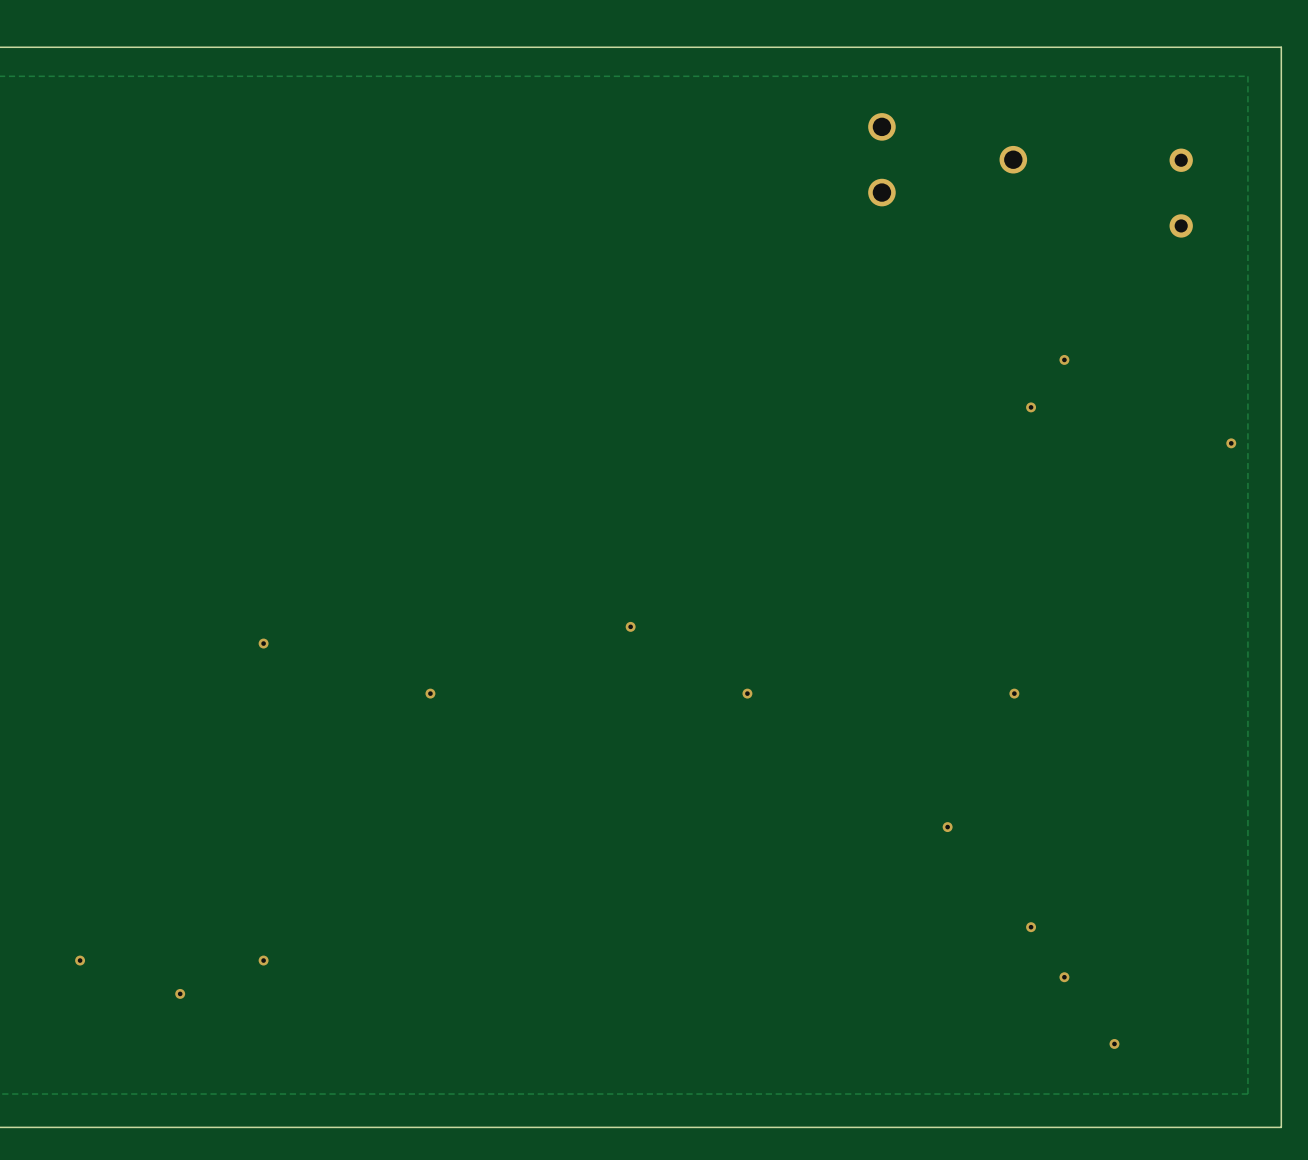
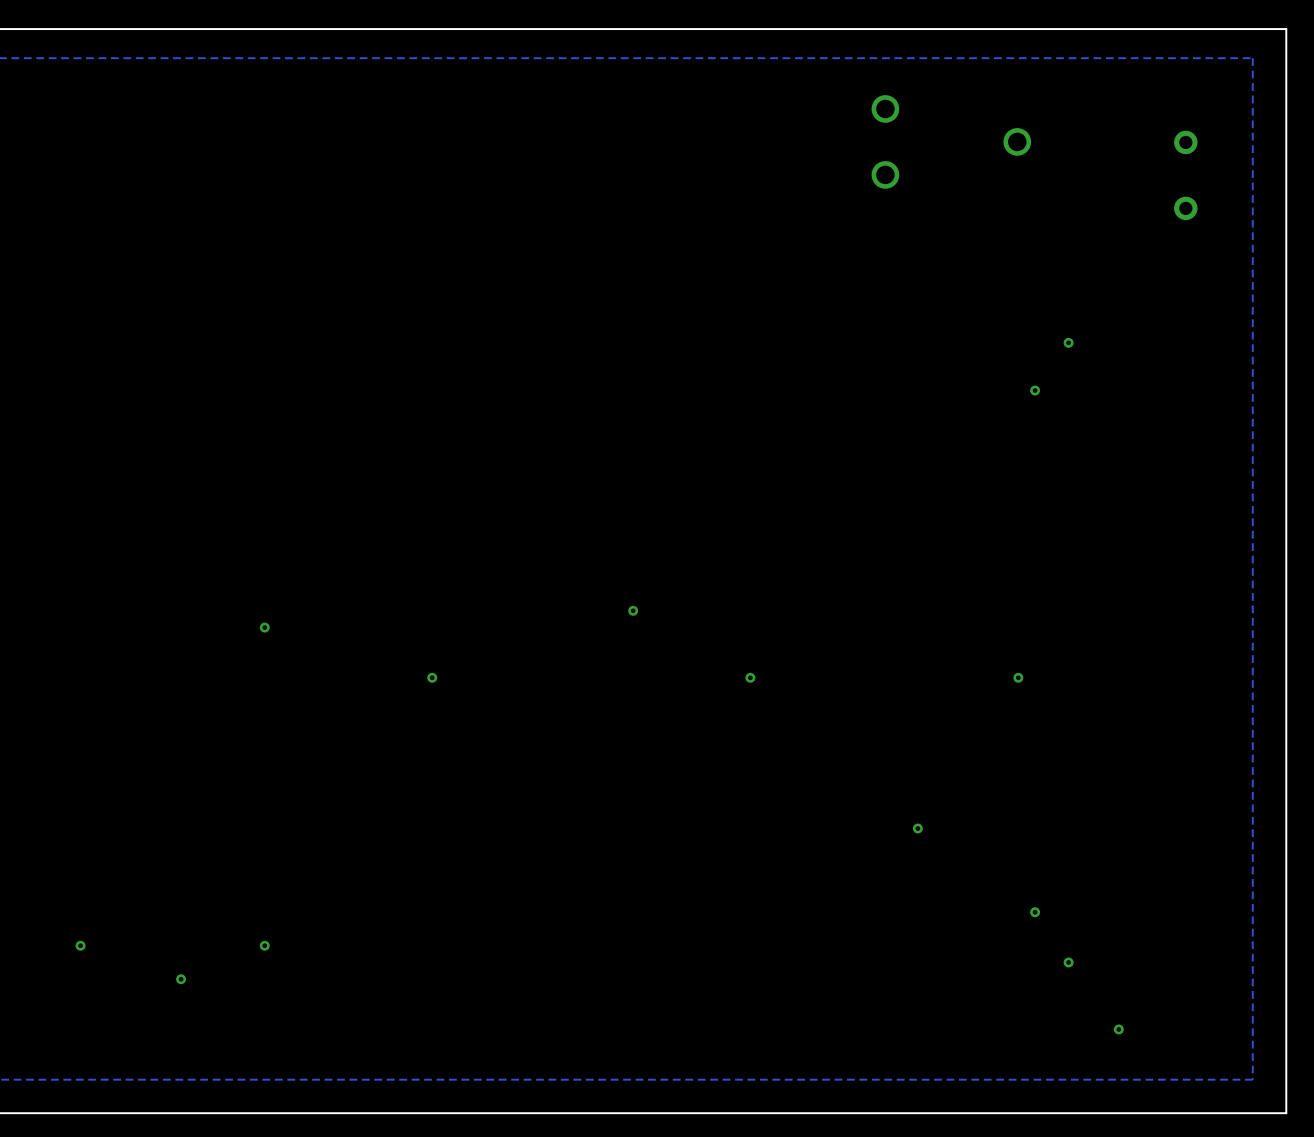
via: (1231, 443) -> none
via position: (947, 827) -> (917, 828)

